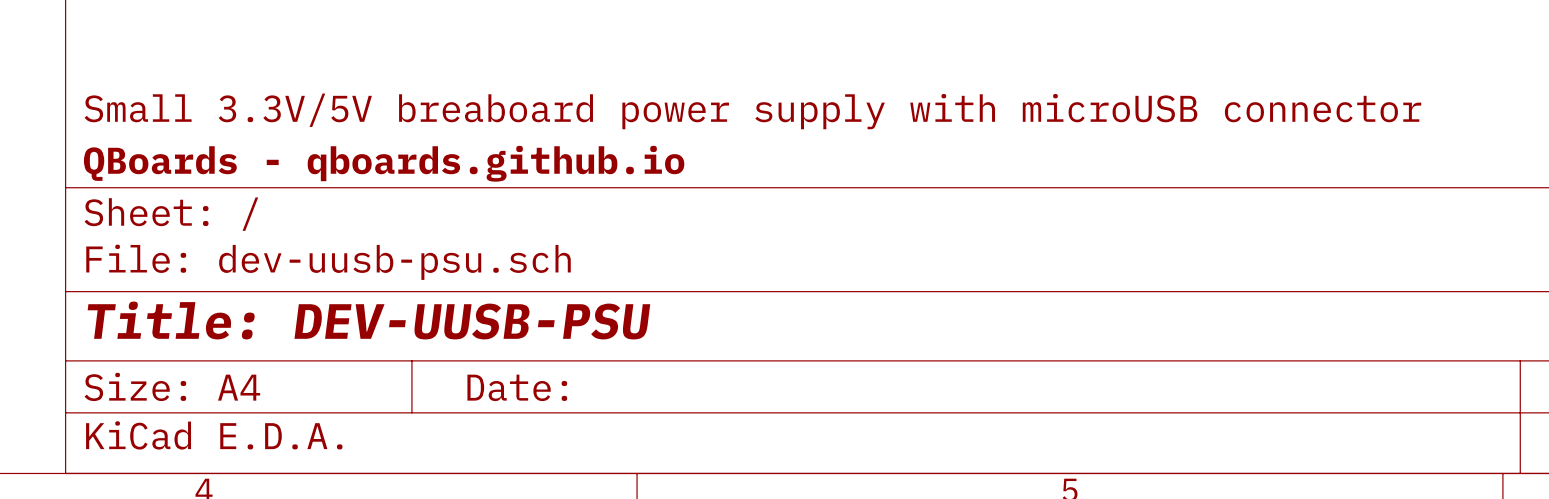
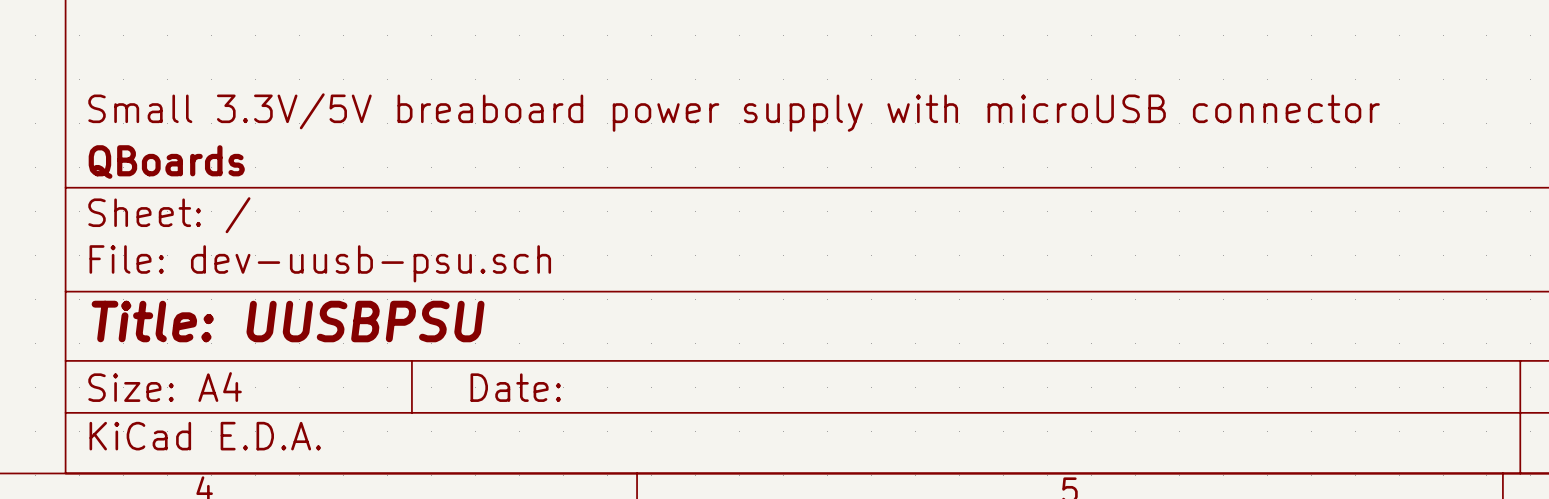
title block: QBoards - qboards.github.io (384, 163) -> QBoards (166, 162)
title block: Title: DEV-UUSB-PSU (368, 320) -> Title: UUSBPSU (288, 321)

